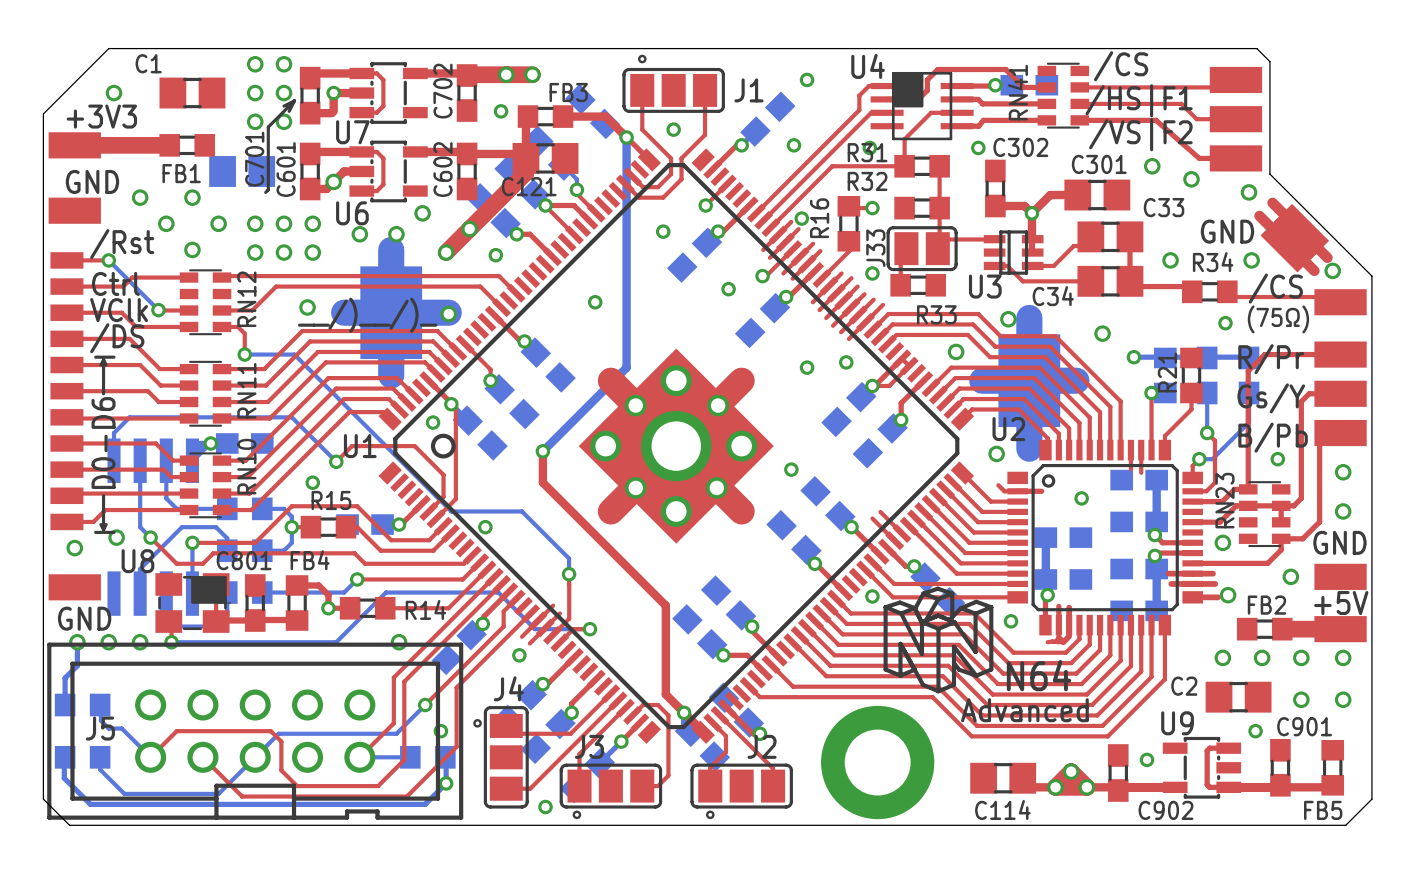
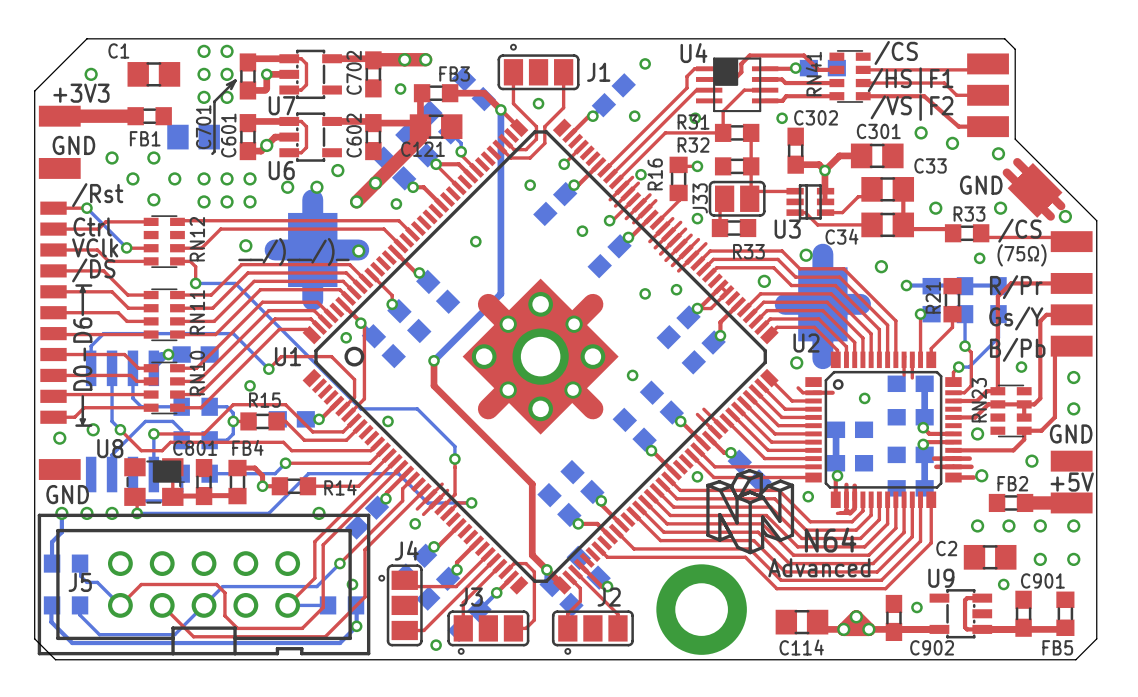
text: R34 (1213, 262) -> R33 (969, 214)

